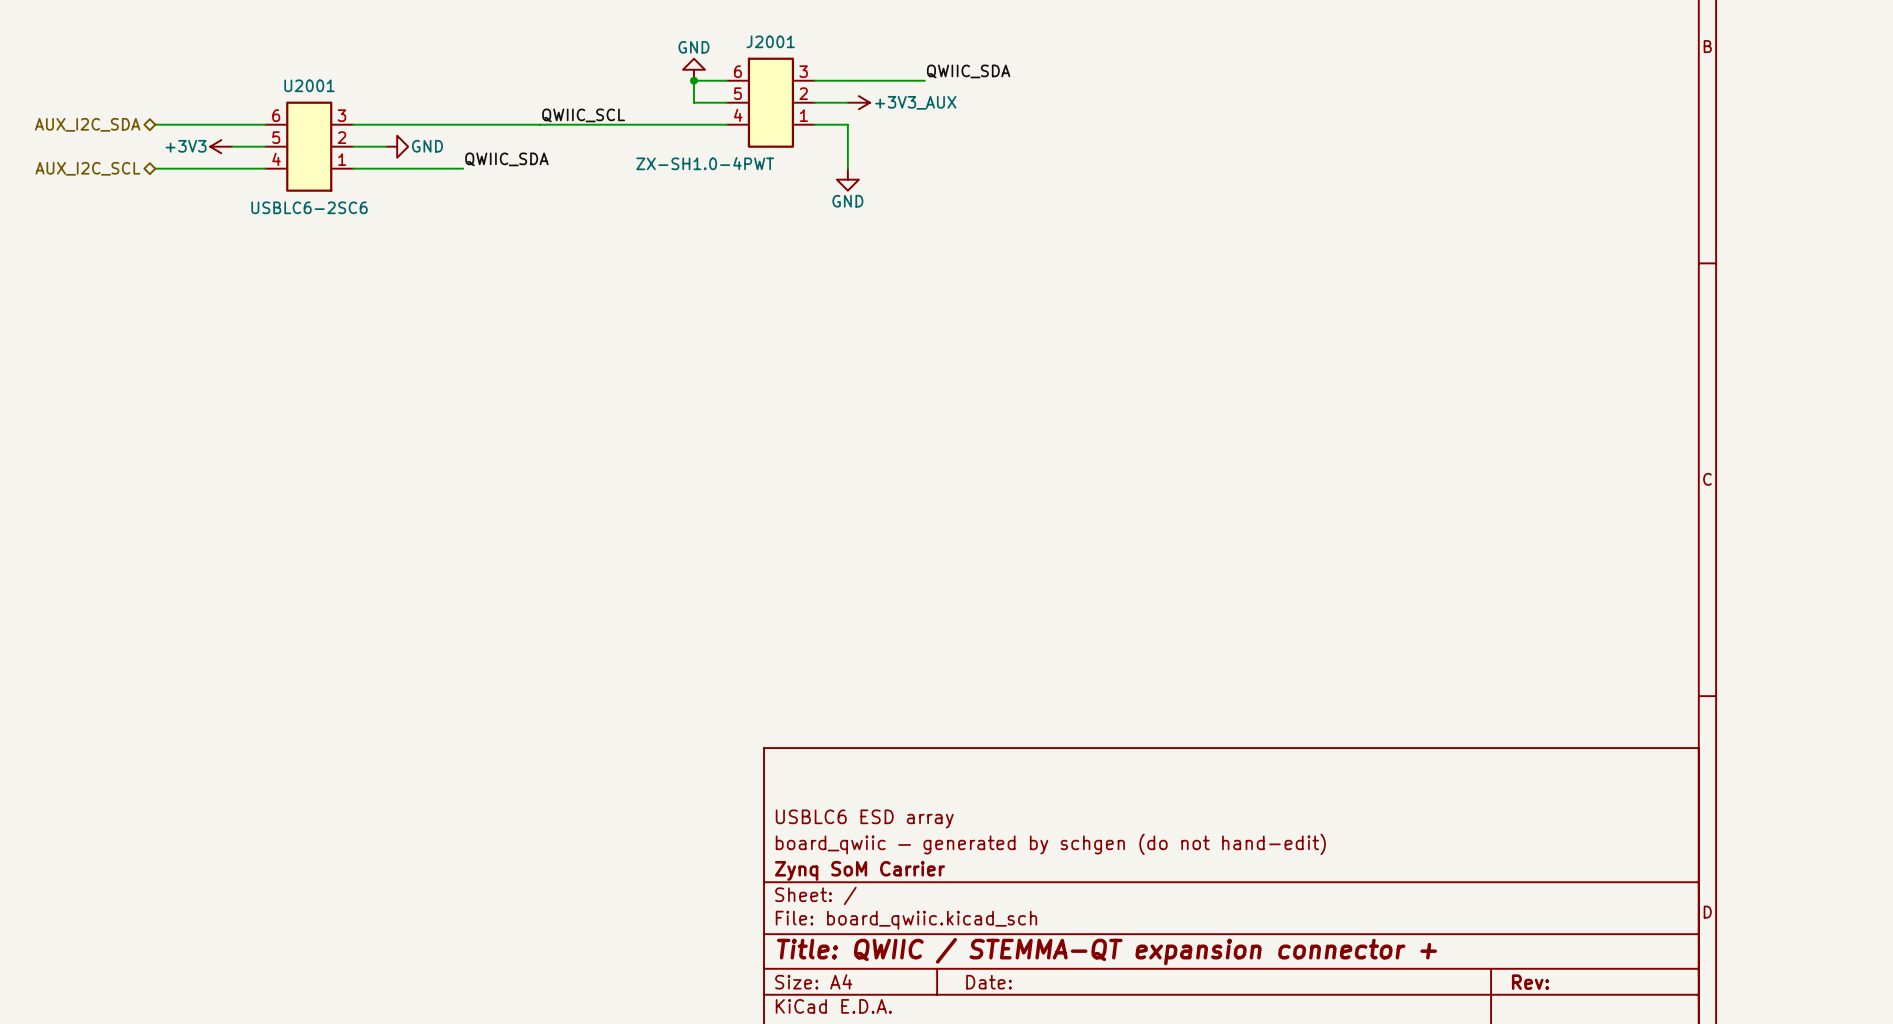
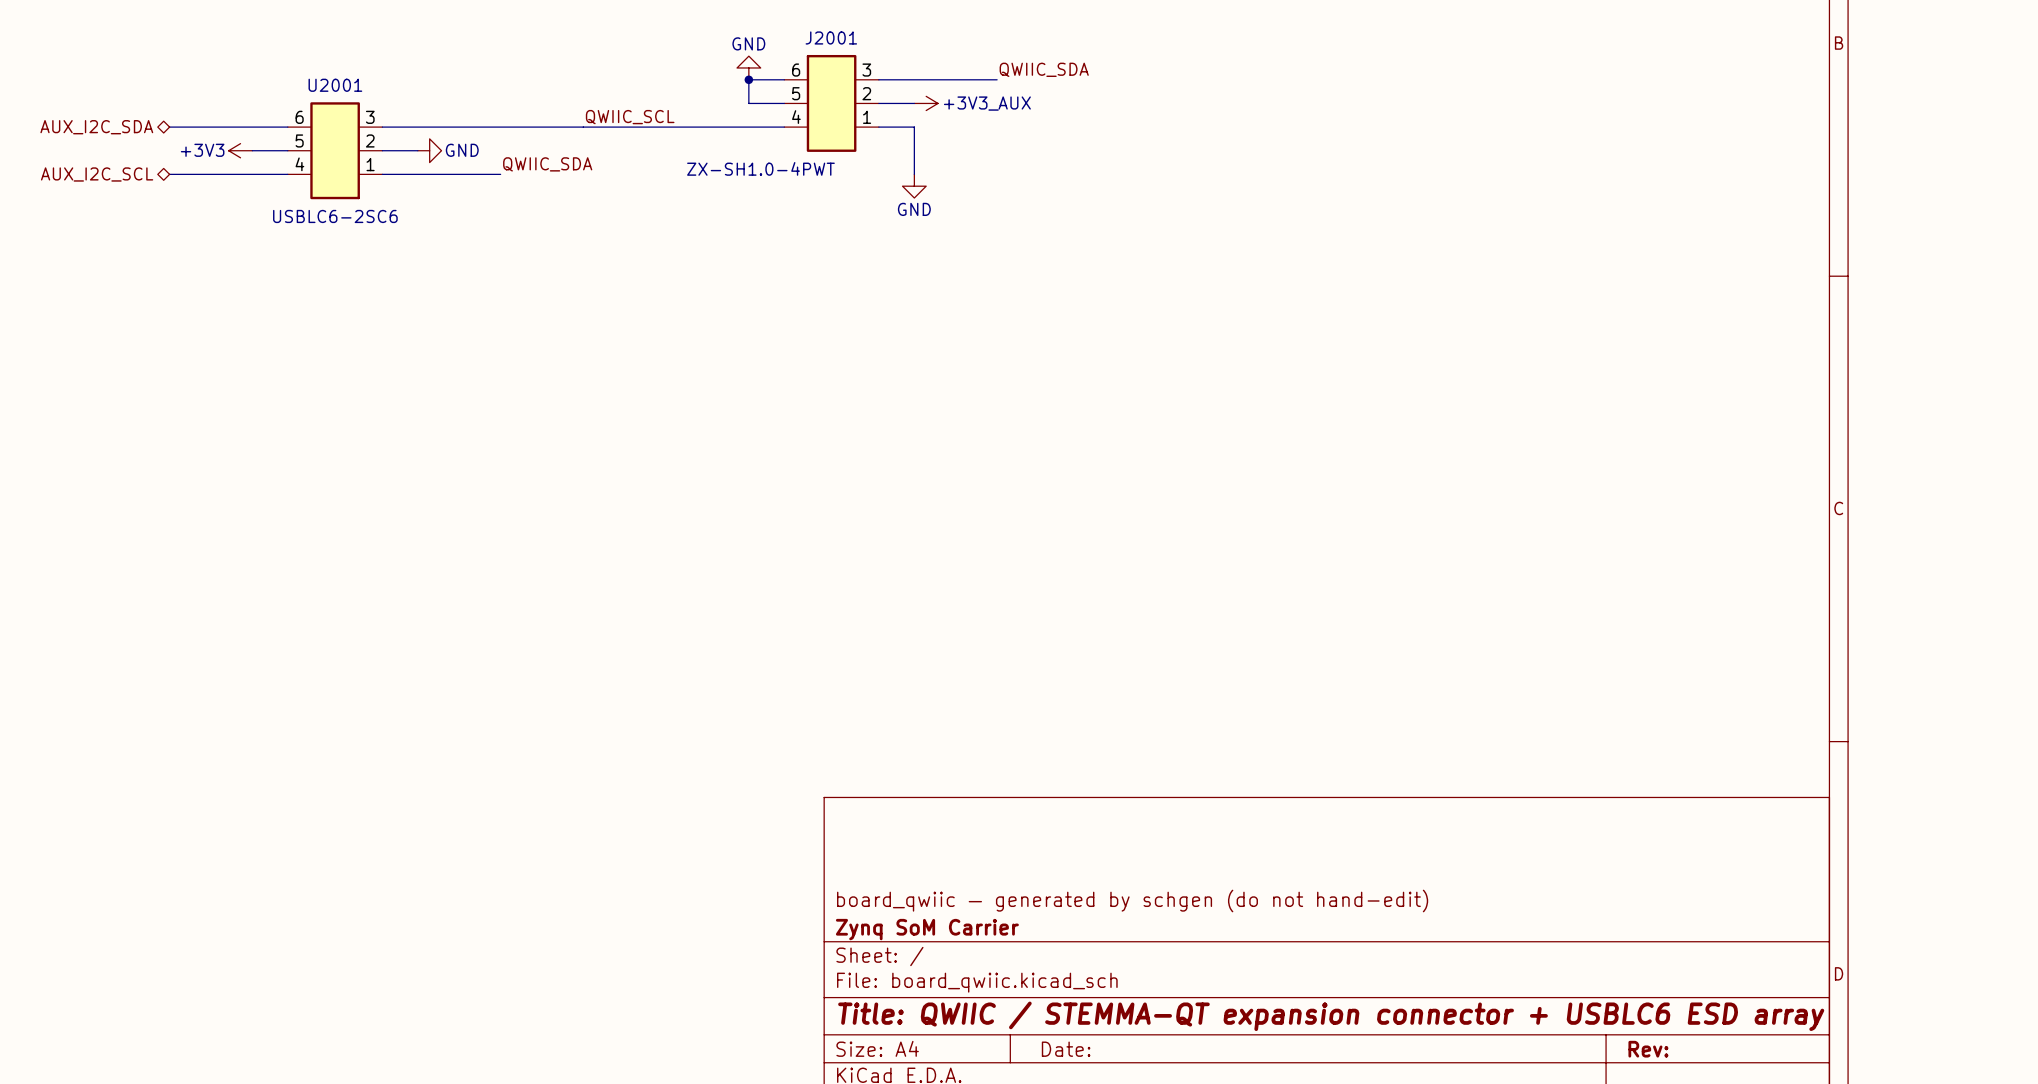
title block: USBLC6 ESD array (864, 819) -> none
title block: Title: QWIIC / STEMMA-QT expansion connector + (1106, 951) -> Title: QWIIC / STEMMA-QT expansion connector + USBLC6 ESD array (1331, 1016)

